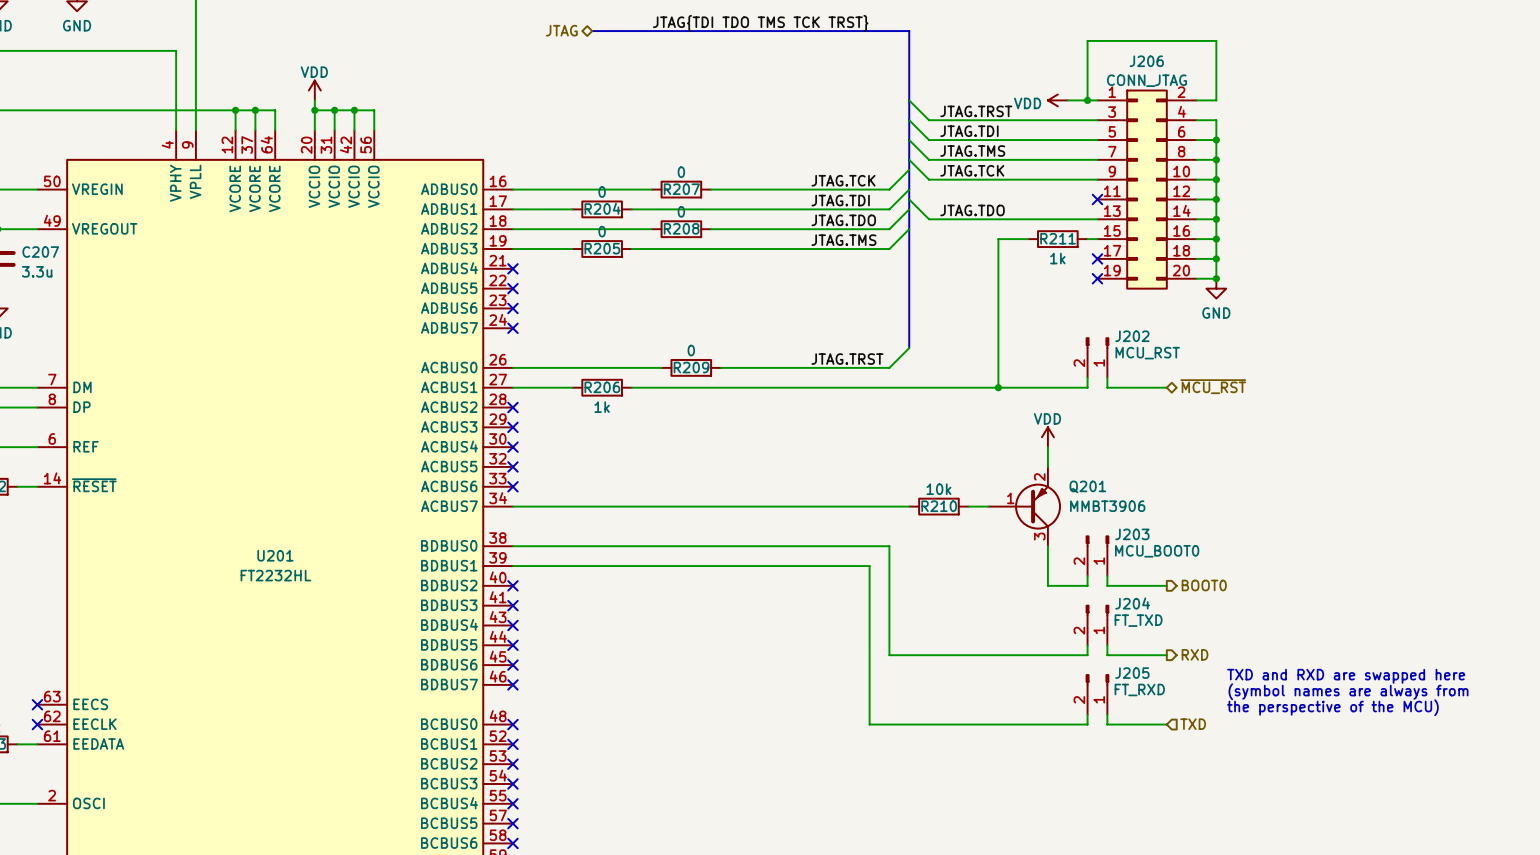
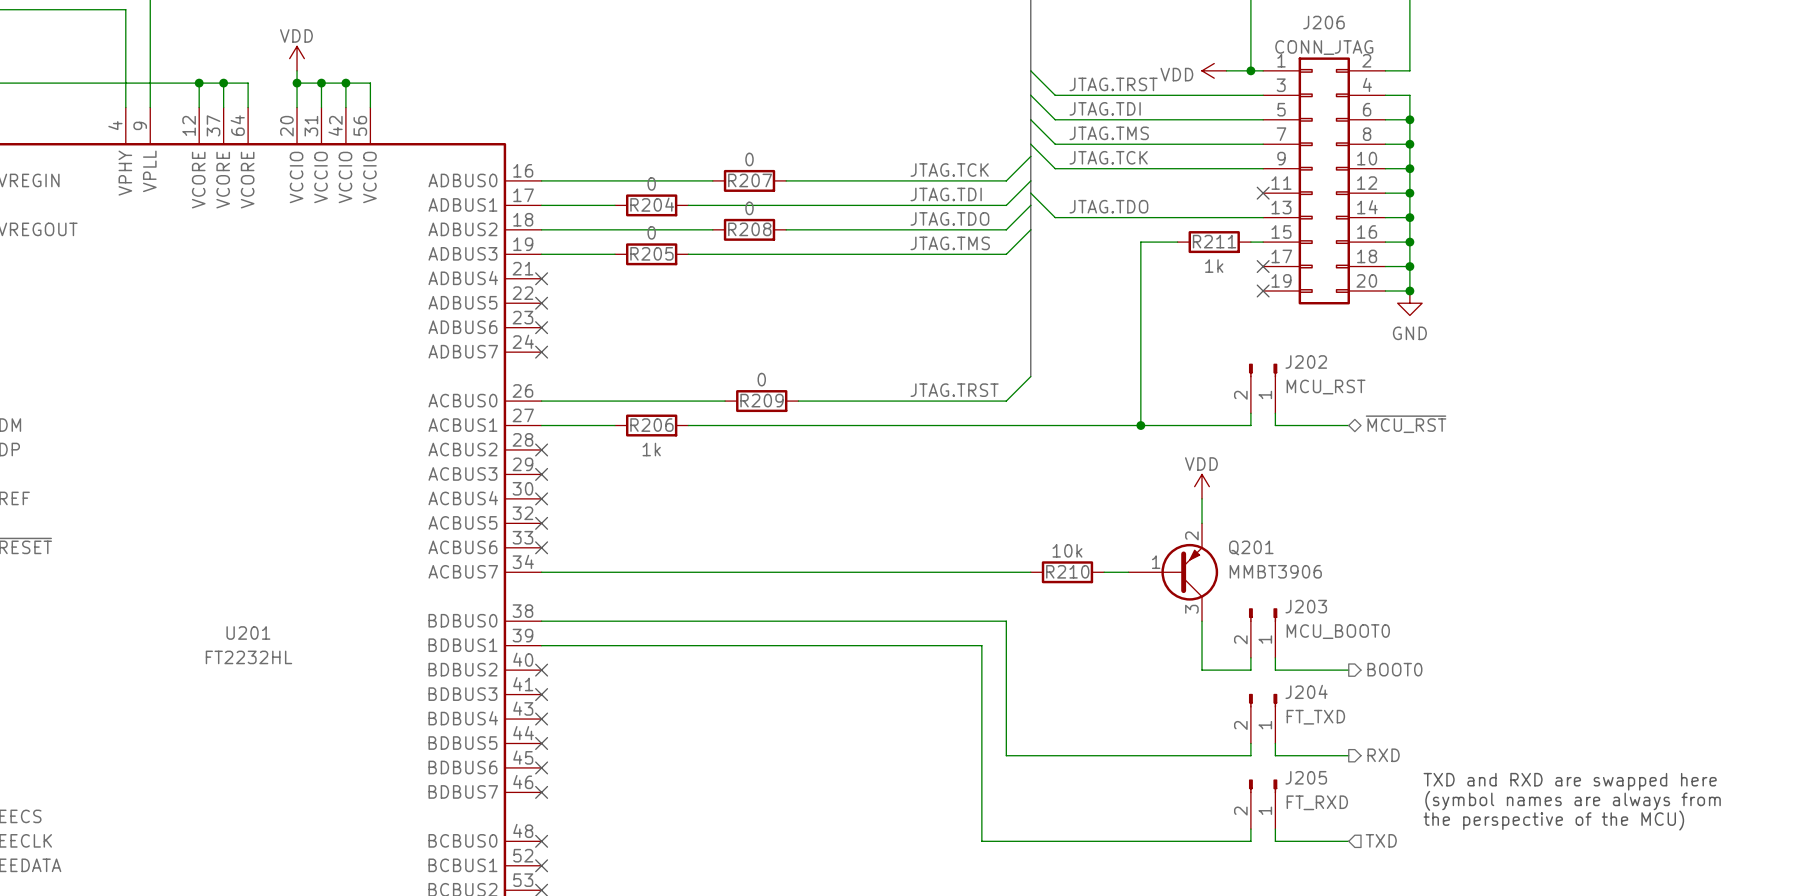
J206 text: CONN_JTAG (1147, 80) -> none
J206 value: none -> CONN_JTAG (1324, 47)
J202 text: MCU_RST (1147, 353) -> none
J202 value: none -> MCU_RST (1326, 387)
J203 text: MCU_BOOT0 (1157, 551) -> none
J203 value: none -> MCU_BOOT0 (1338, 631)
J204 text: FT_TXD (1138, 620) -> none
J204 value: none -> FT_TXD (1315, 717)
J205 text: FT_RXD (1139, 689) -> none
J205 value: none -> FT_RXD (1317, 802)

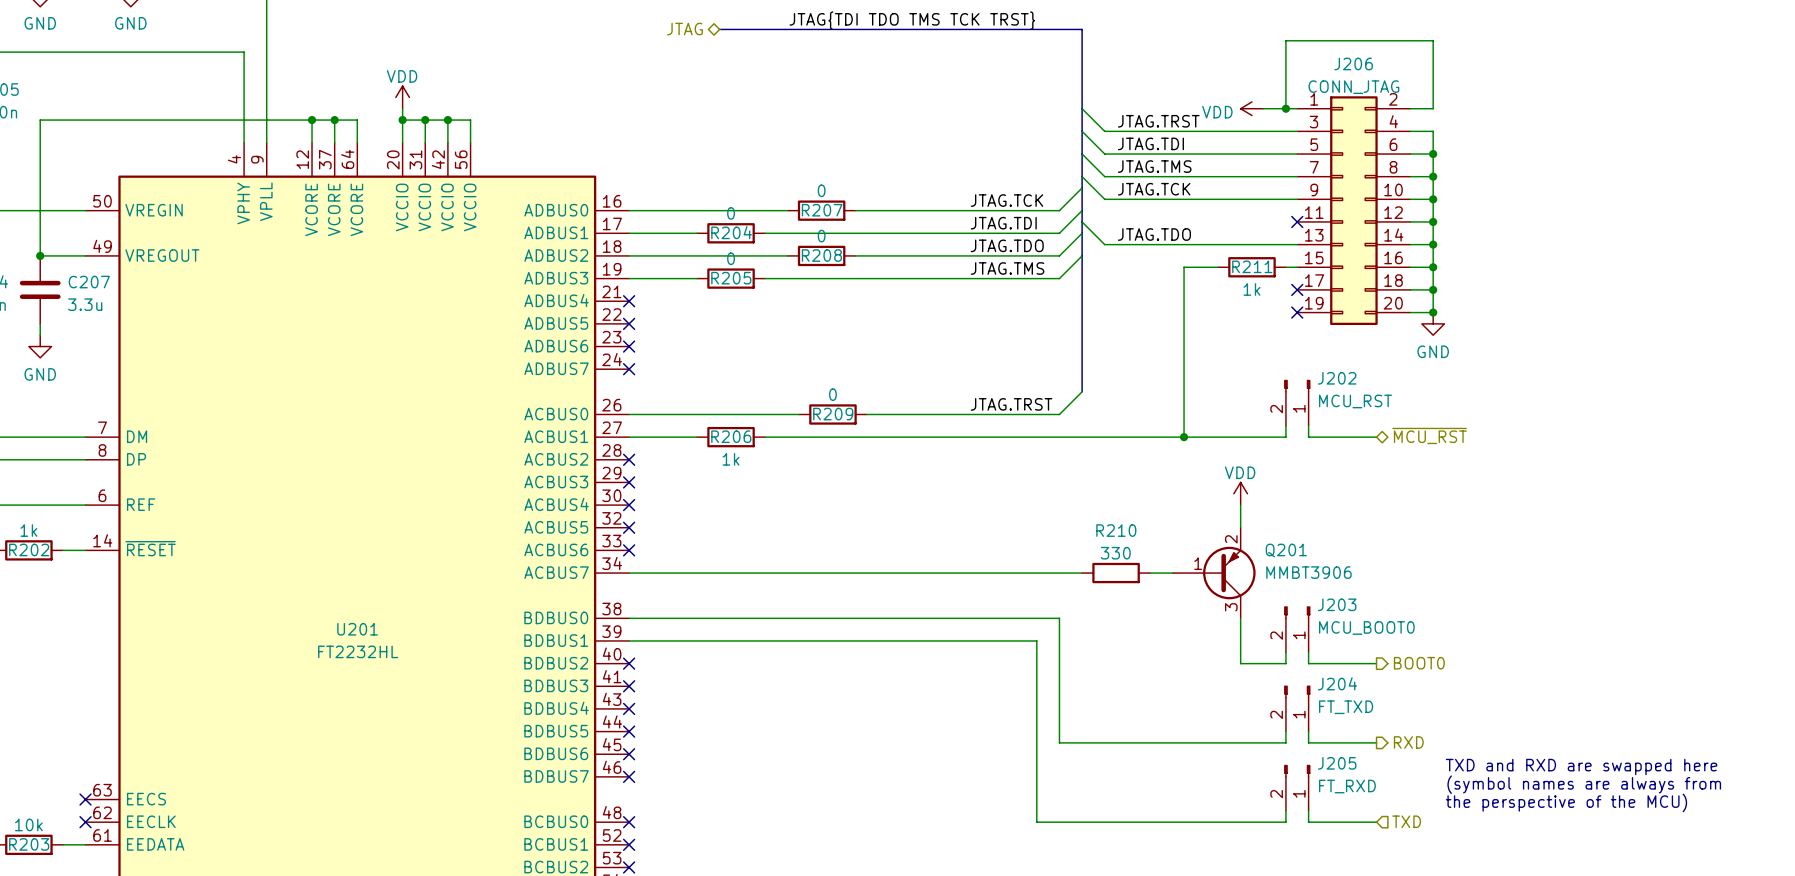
R210 value: 10k (1067, 550) -> 330 (1115, 553)
R210 name position: R210 (1067, 571) -> R210 (1116, 530)

